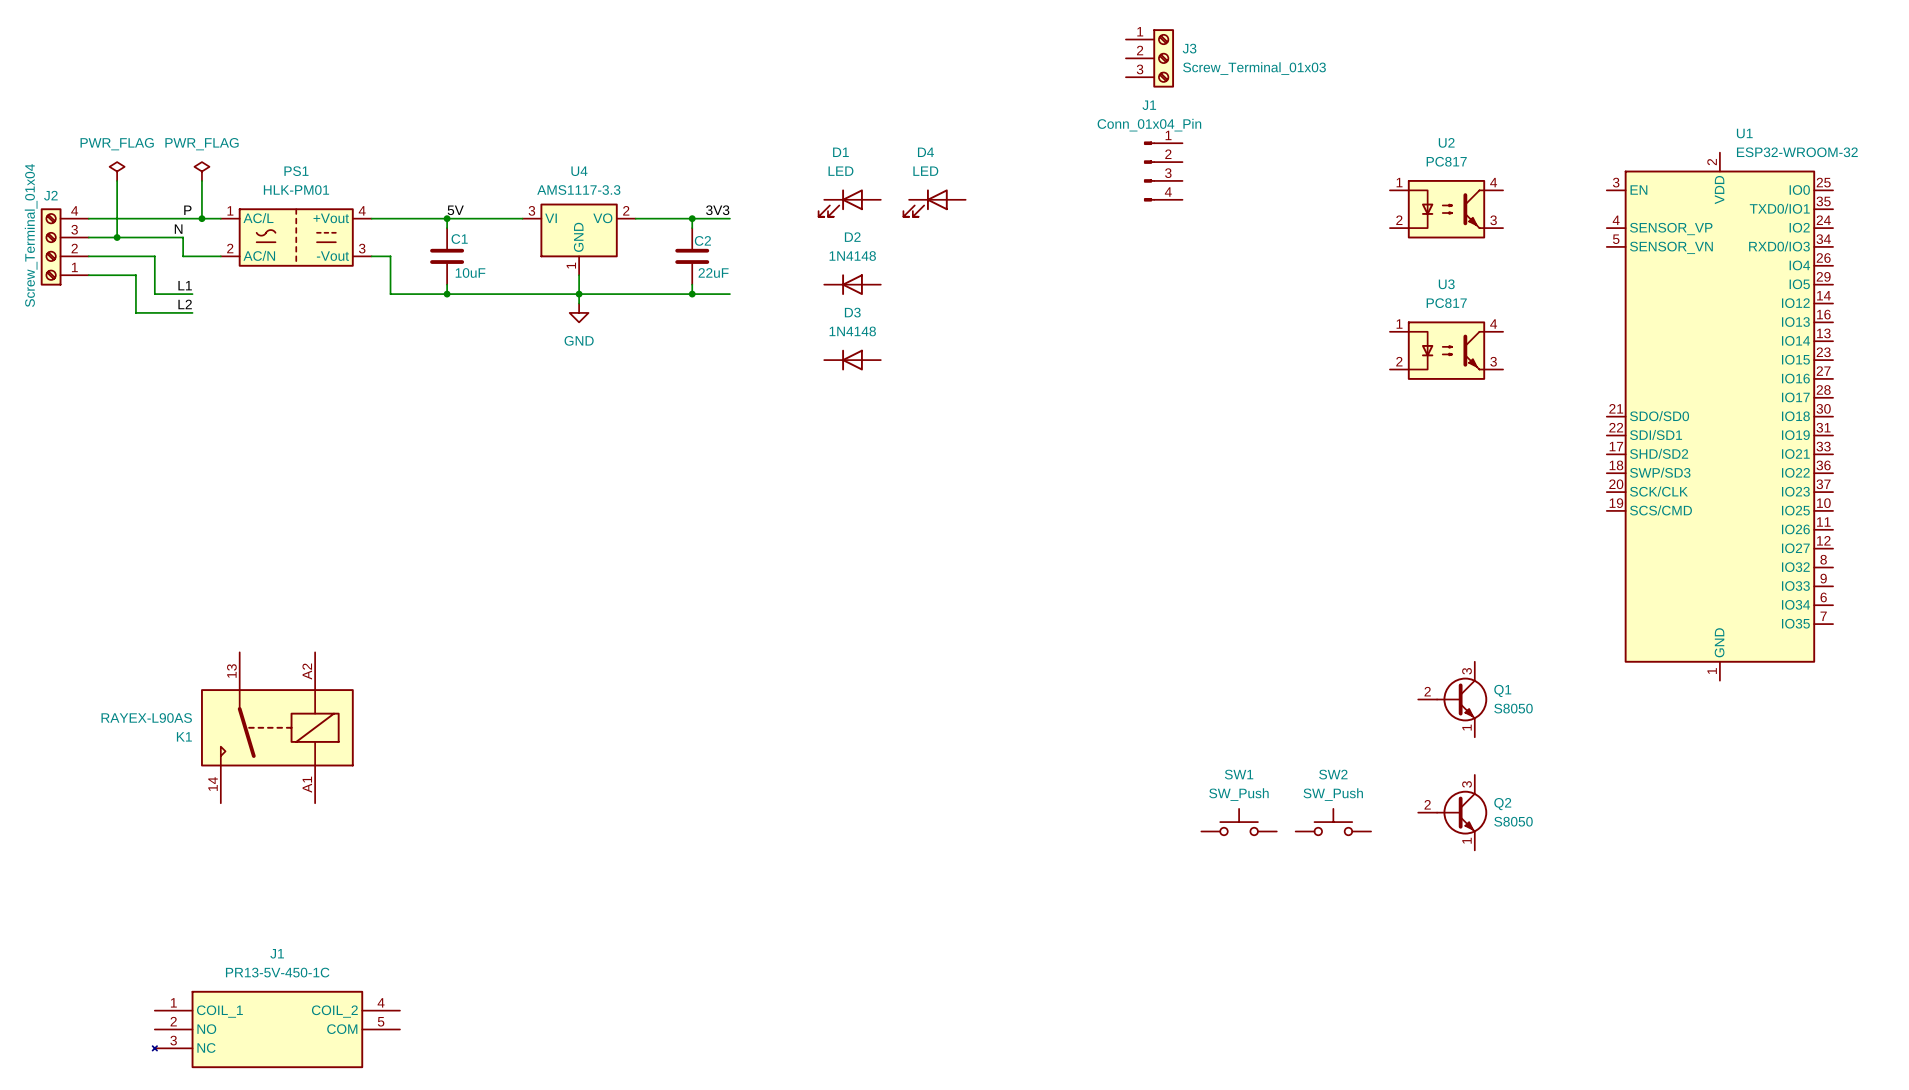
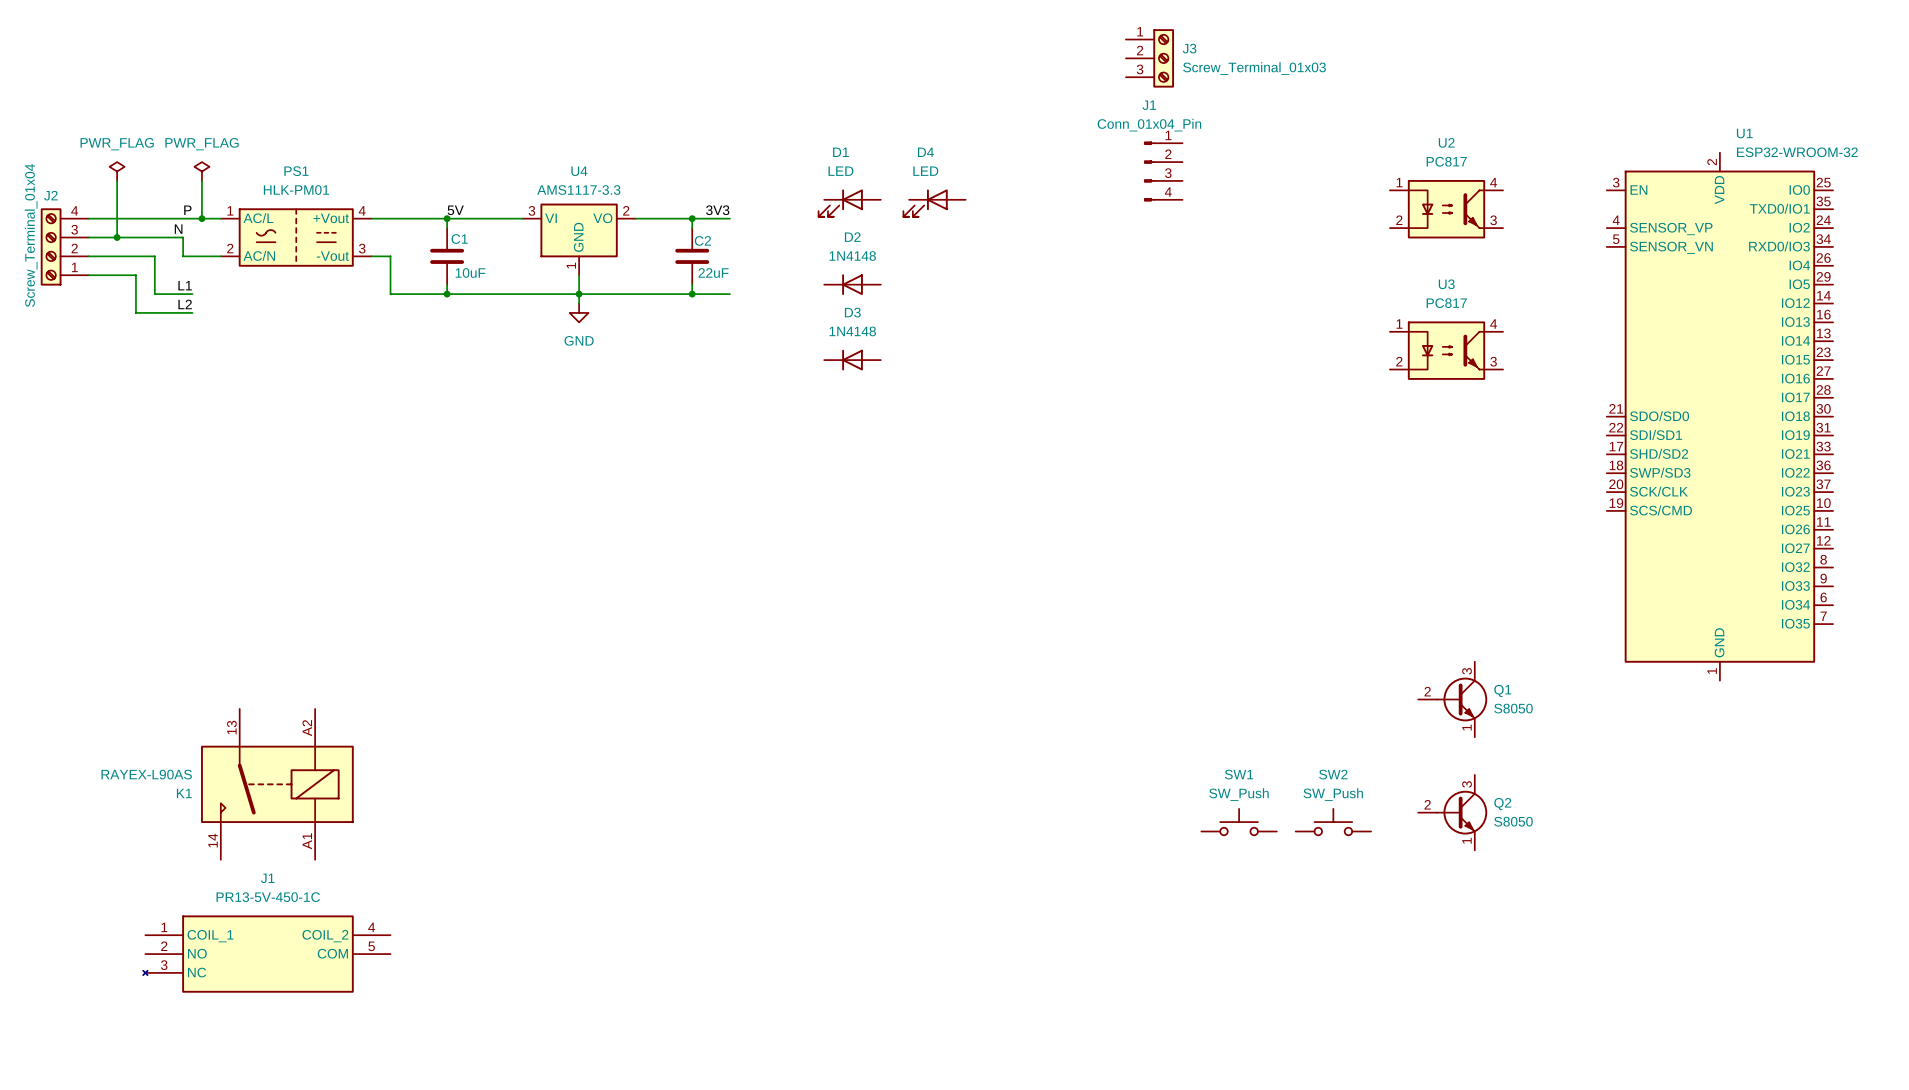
K1 position: (277, 727) -> (277, 784)
J1 position: (276, 1029) -> (266, 954)

